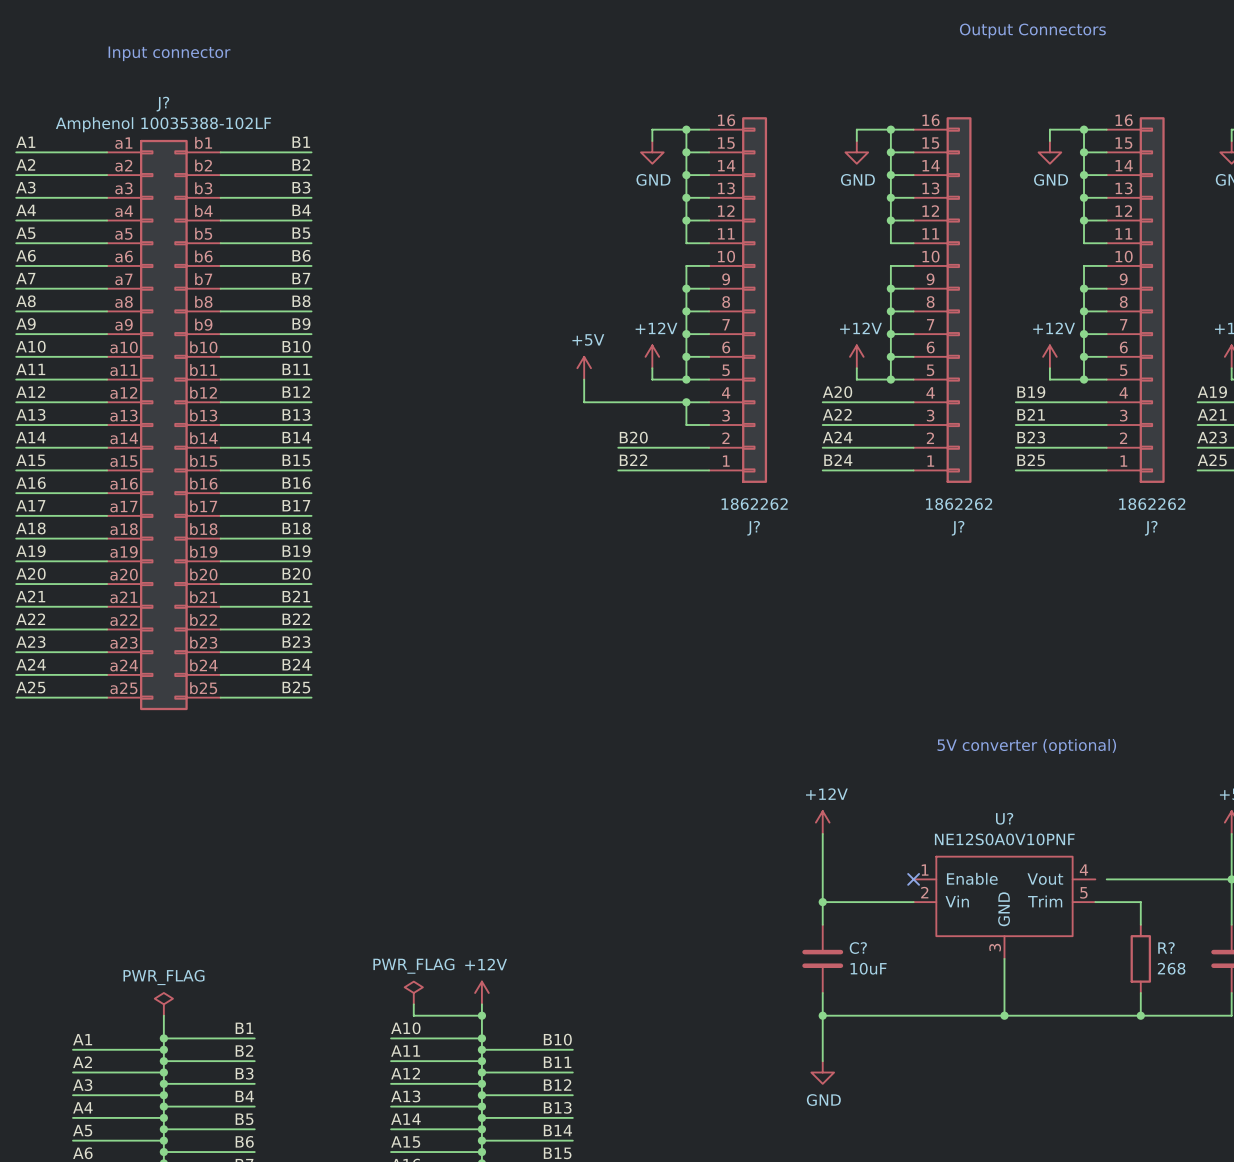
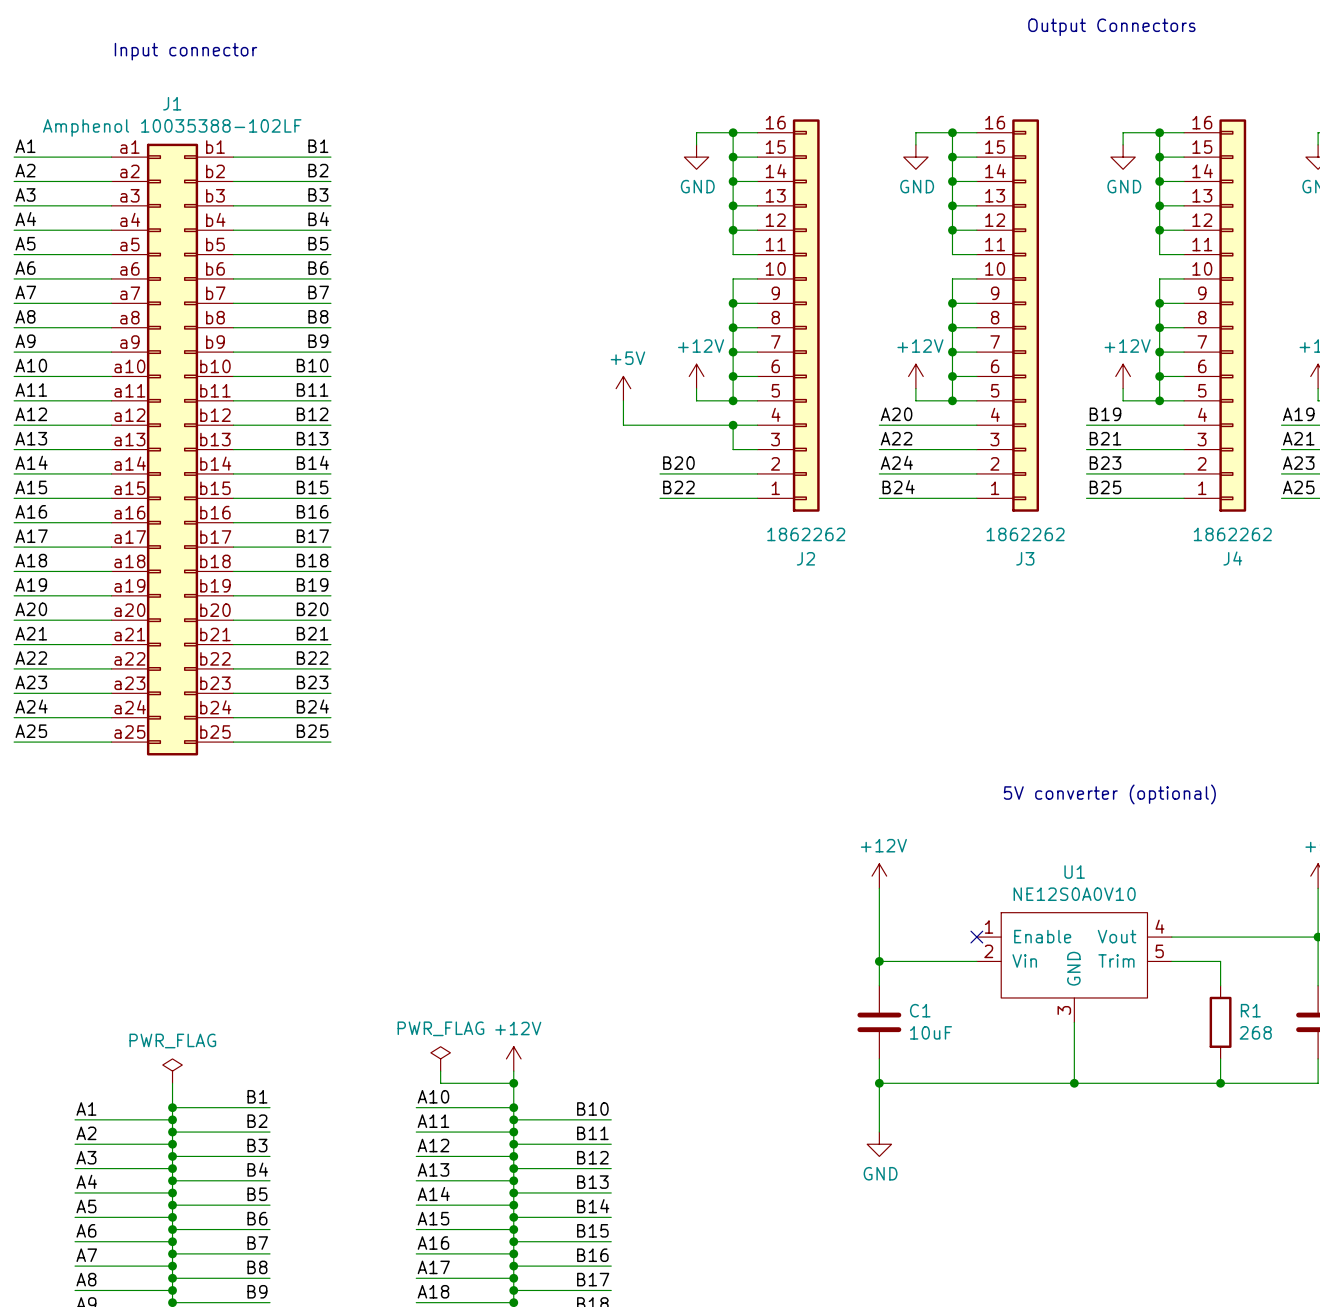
J? name: J? (162, 104) -> J1 (172, 103)
J? name: J? (753, 528) -> J2 (805, 558)
J? name: J? (958, 528) -> J3 (1025, 558)
J? name: J? (1151, 528) -> J4 (1232, 558)
U? name: U? (1004, 818) -> U1 (1074, 872)
U? value: NE12S0A0V10PNF (1004, 839) -> NE12S0A0V10 (1074, 894)
wire: none -> (1171, 937) (1184, 937)
R? name: R? (1166, 947) -> R1 (1250, 1010)
C? name: C? (858, 948) -> C1 (920, 1010)

